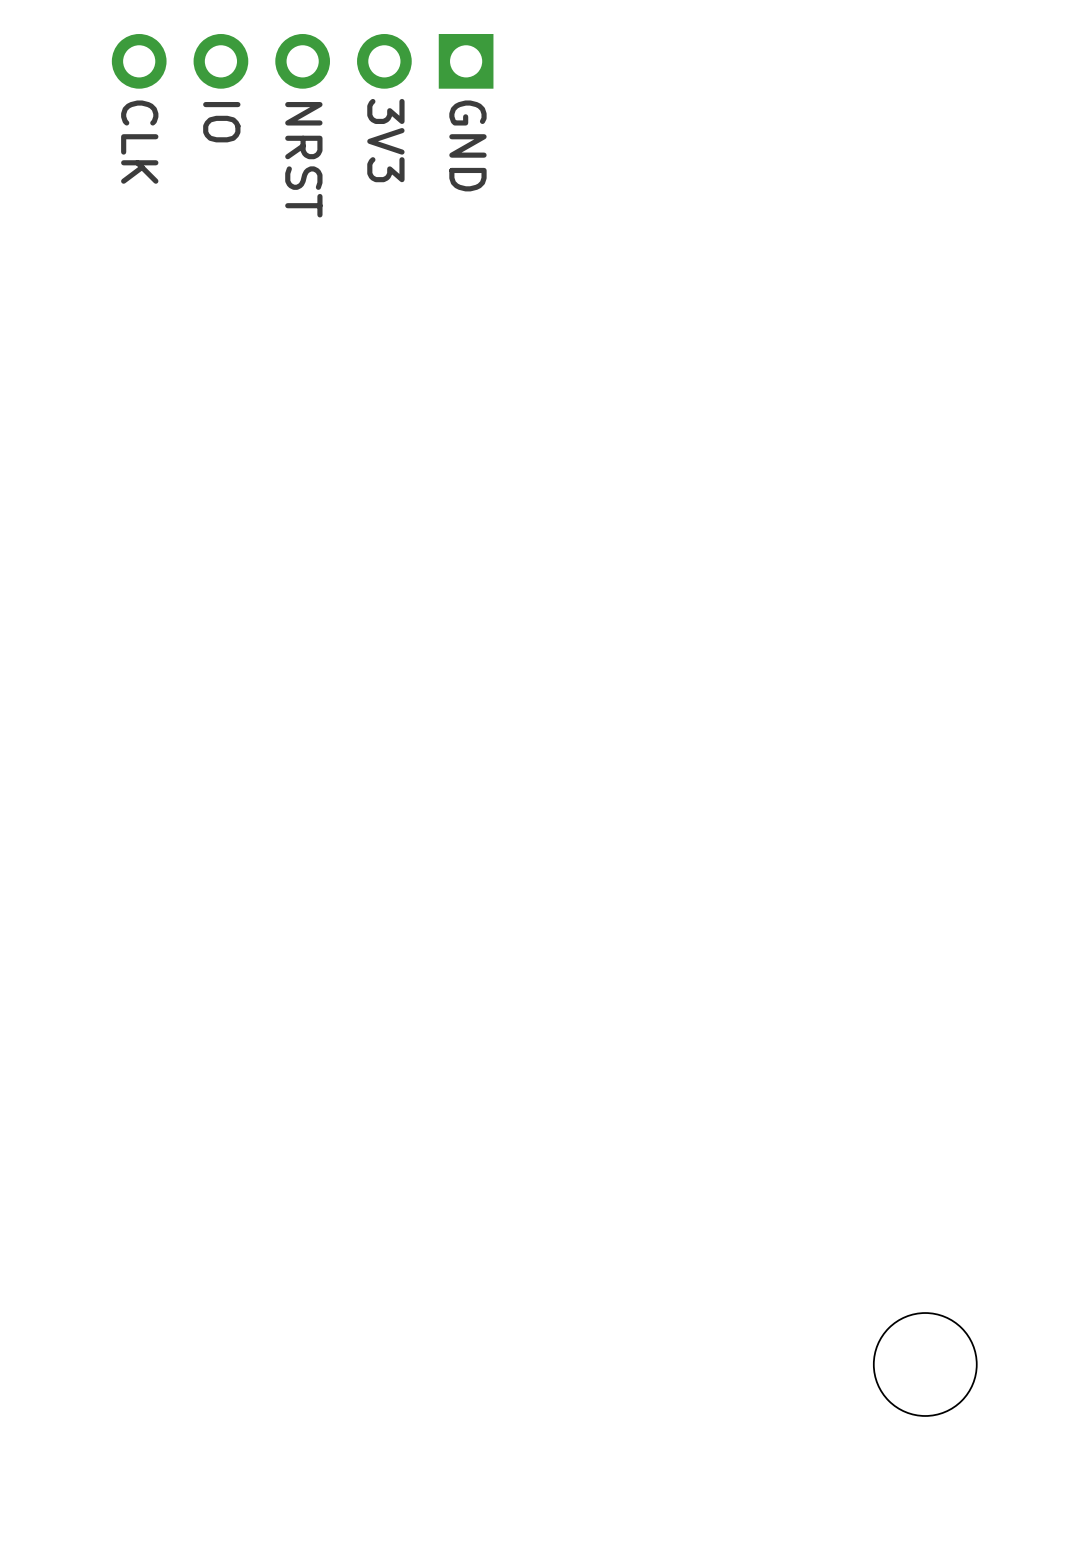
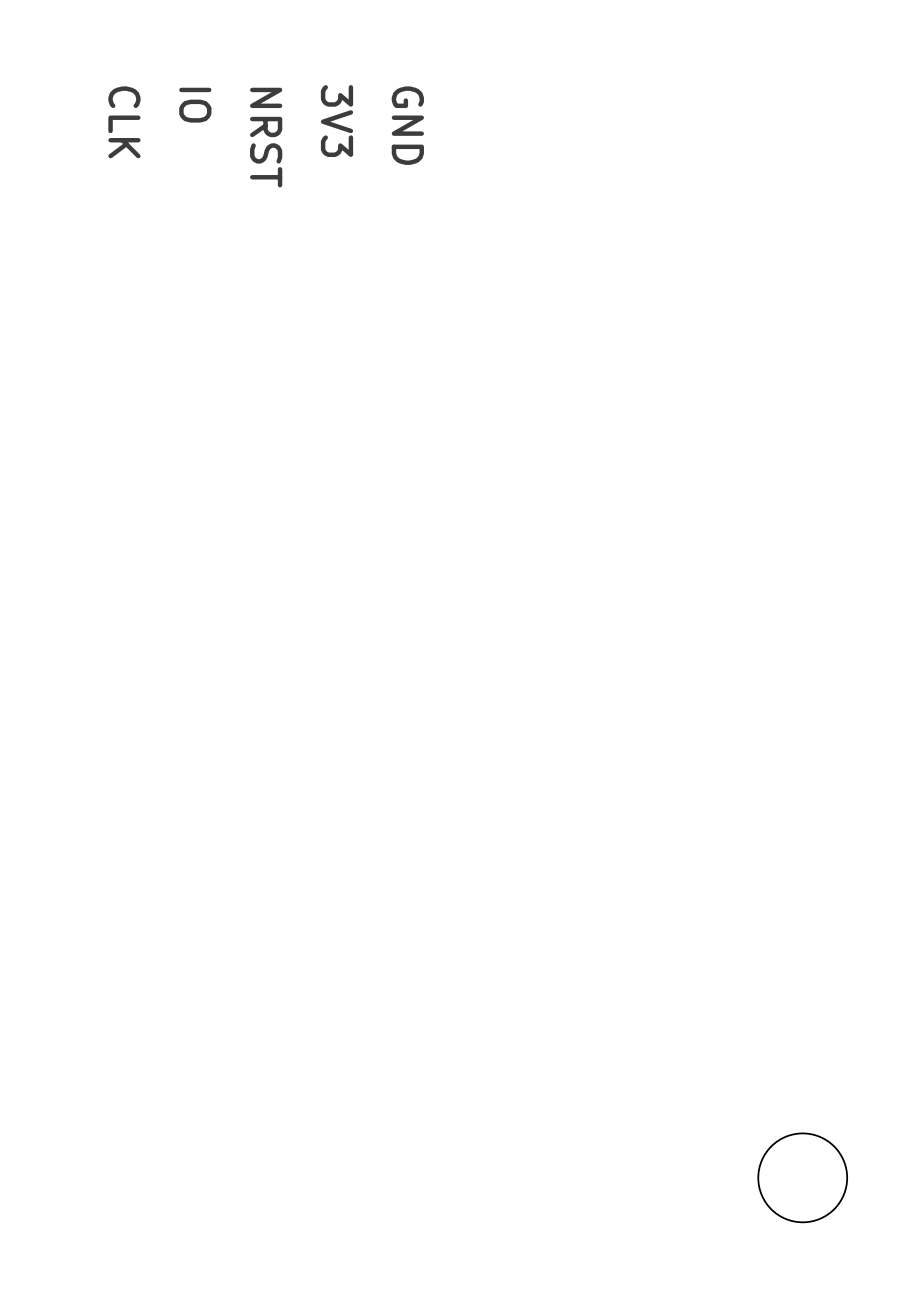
part: (302, 61) -> none

